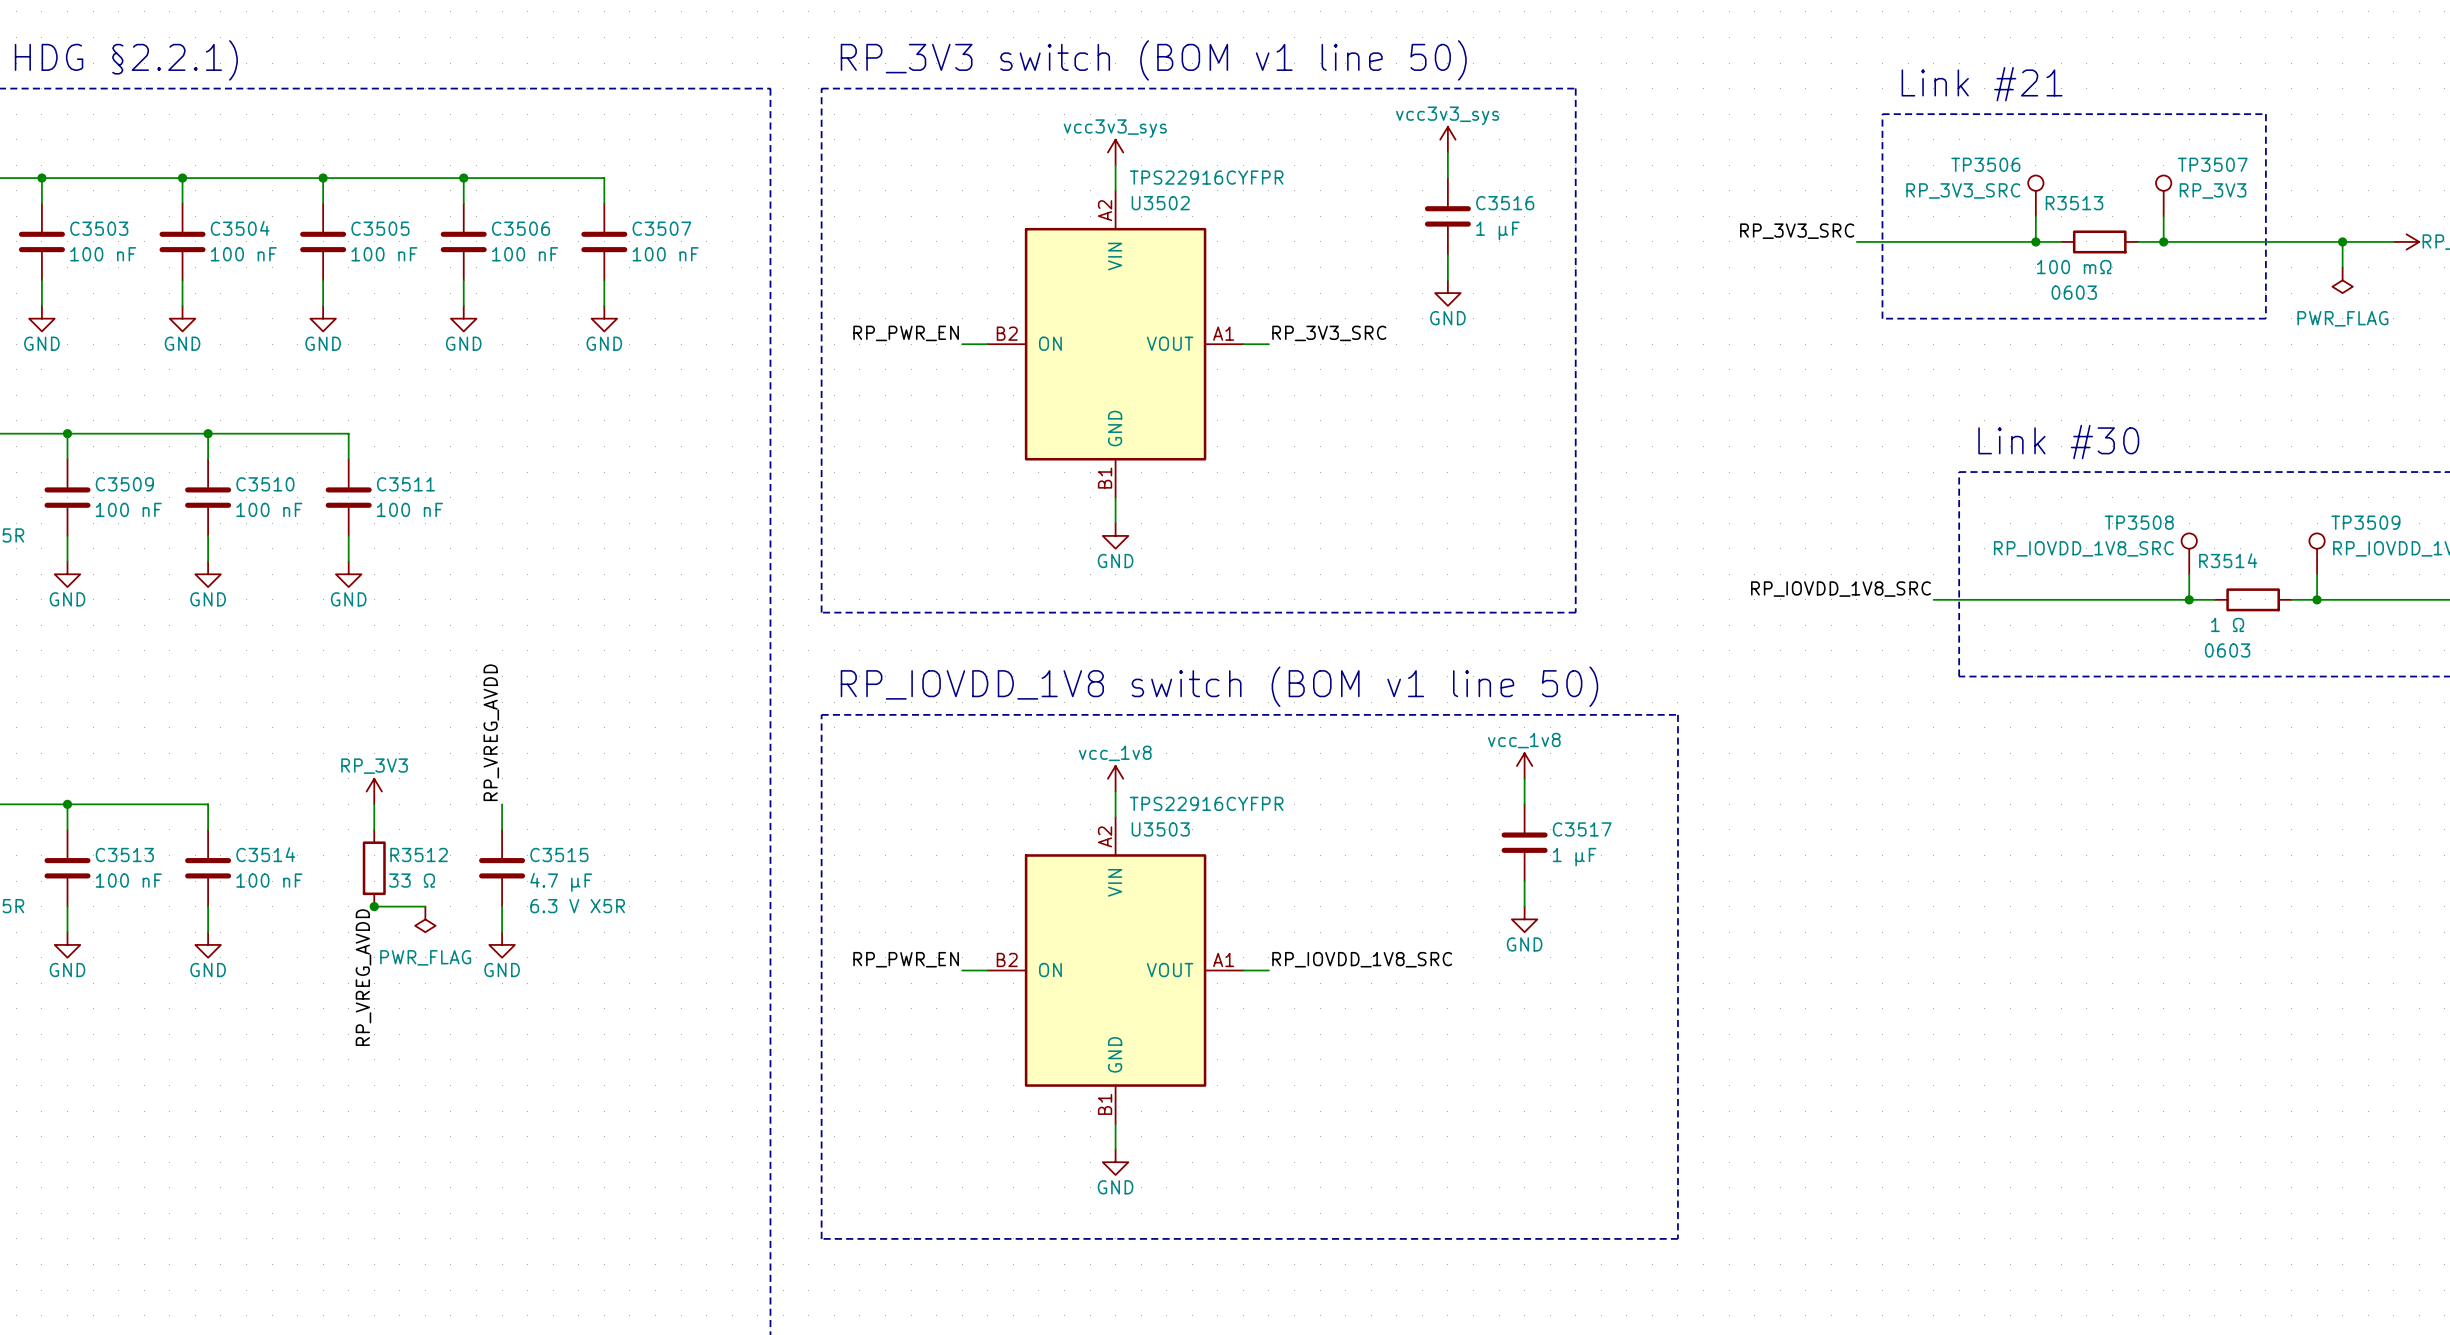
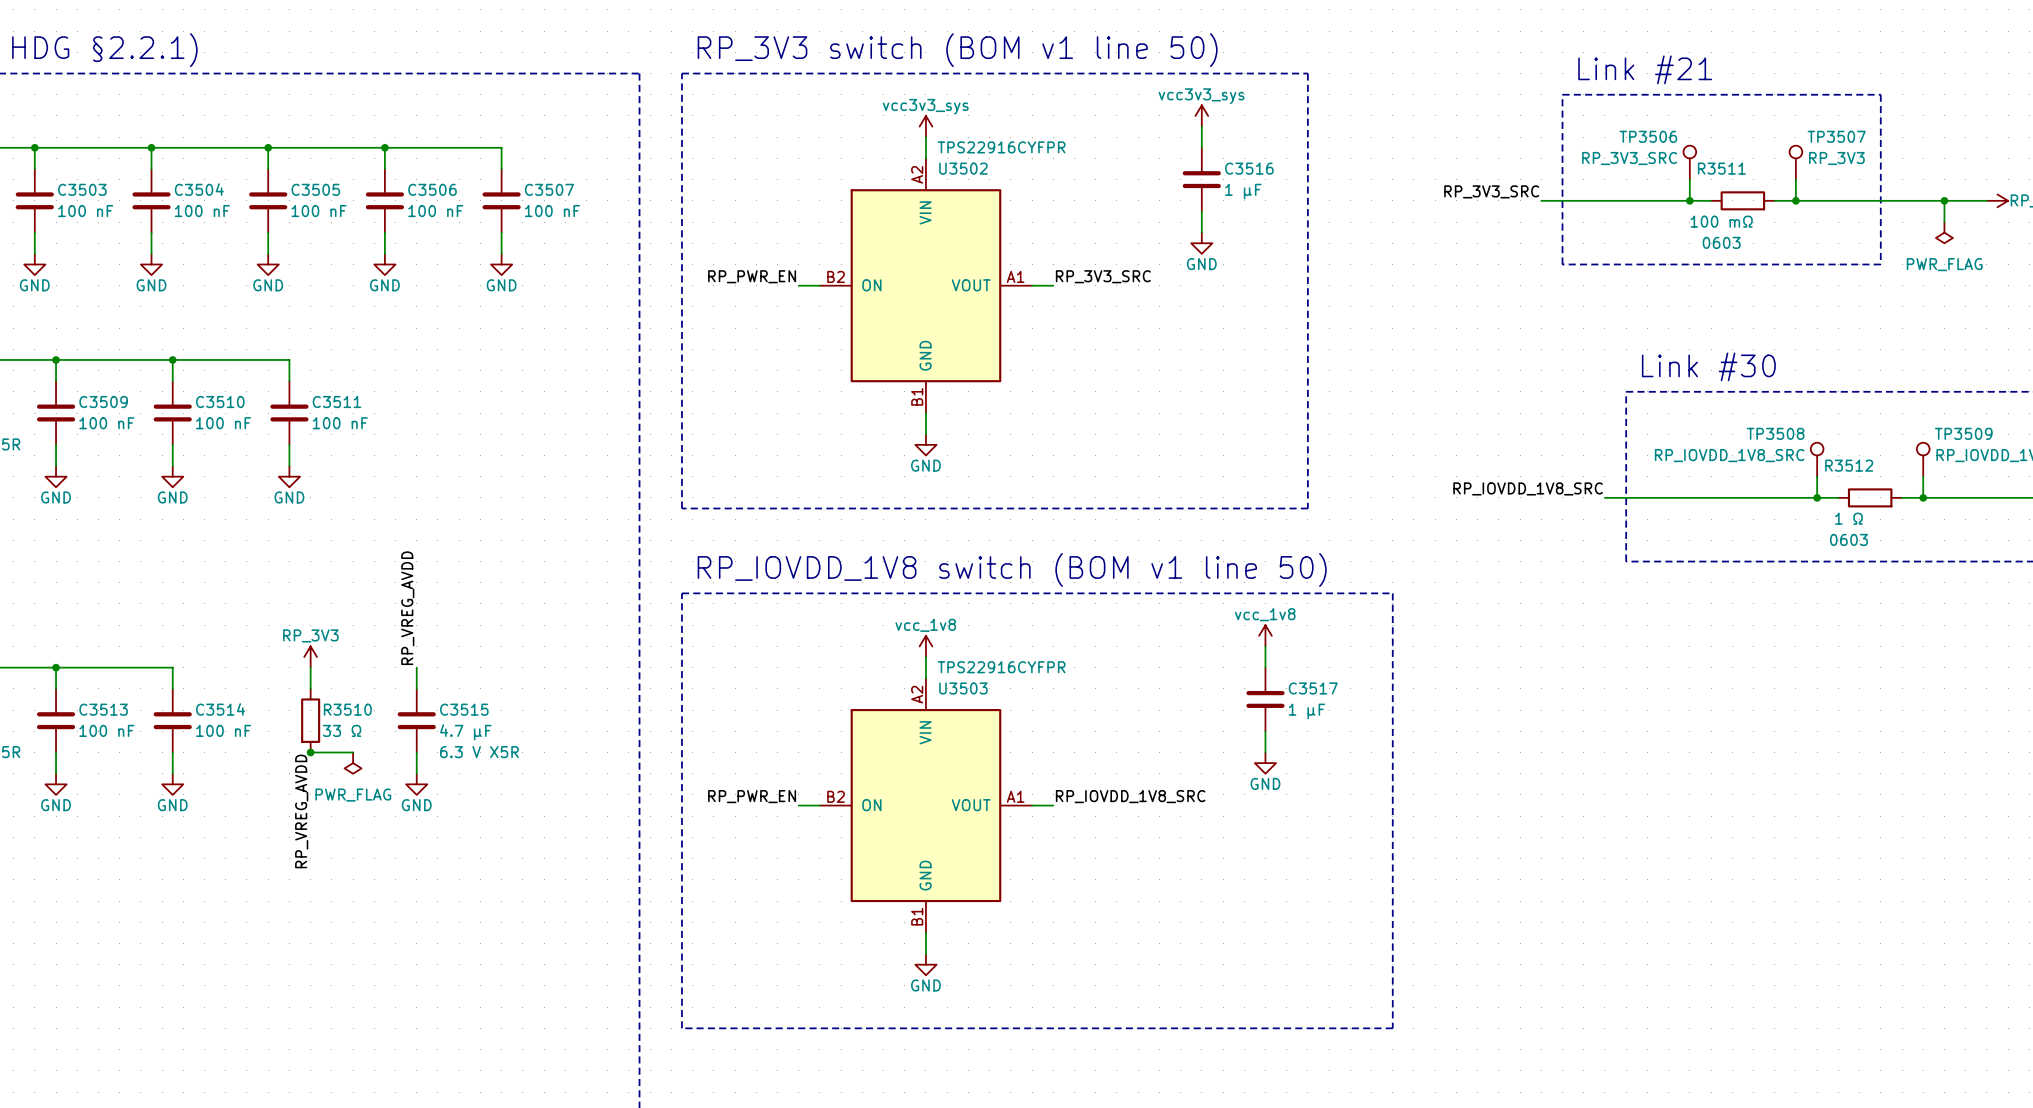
R3513 name: R3513 (2074, 203) -> R3511 (1721, 168)
R3514 name: R3514 (2228, 560) -> R3512 (1849, 465)
R3512 name: R3512 (419, 855) -> R3510 (347, 709)

